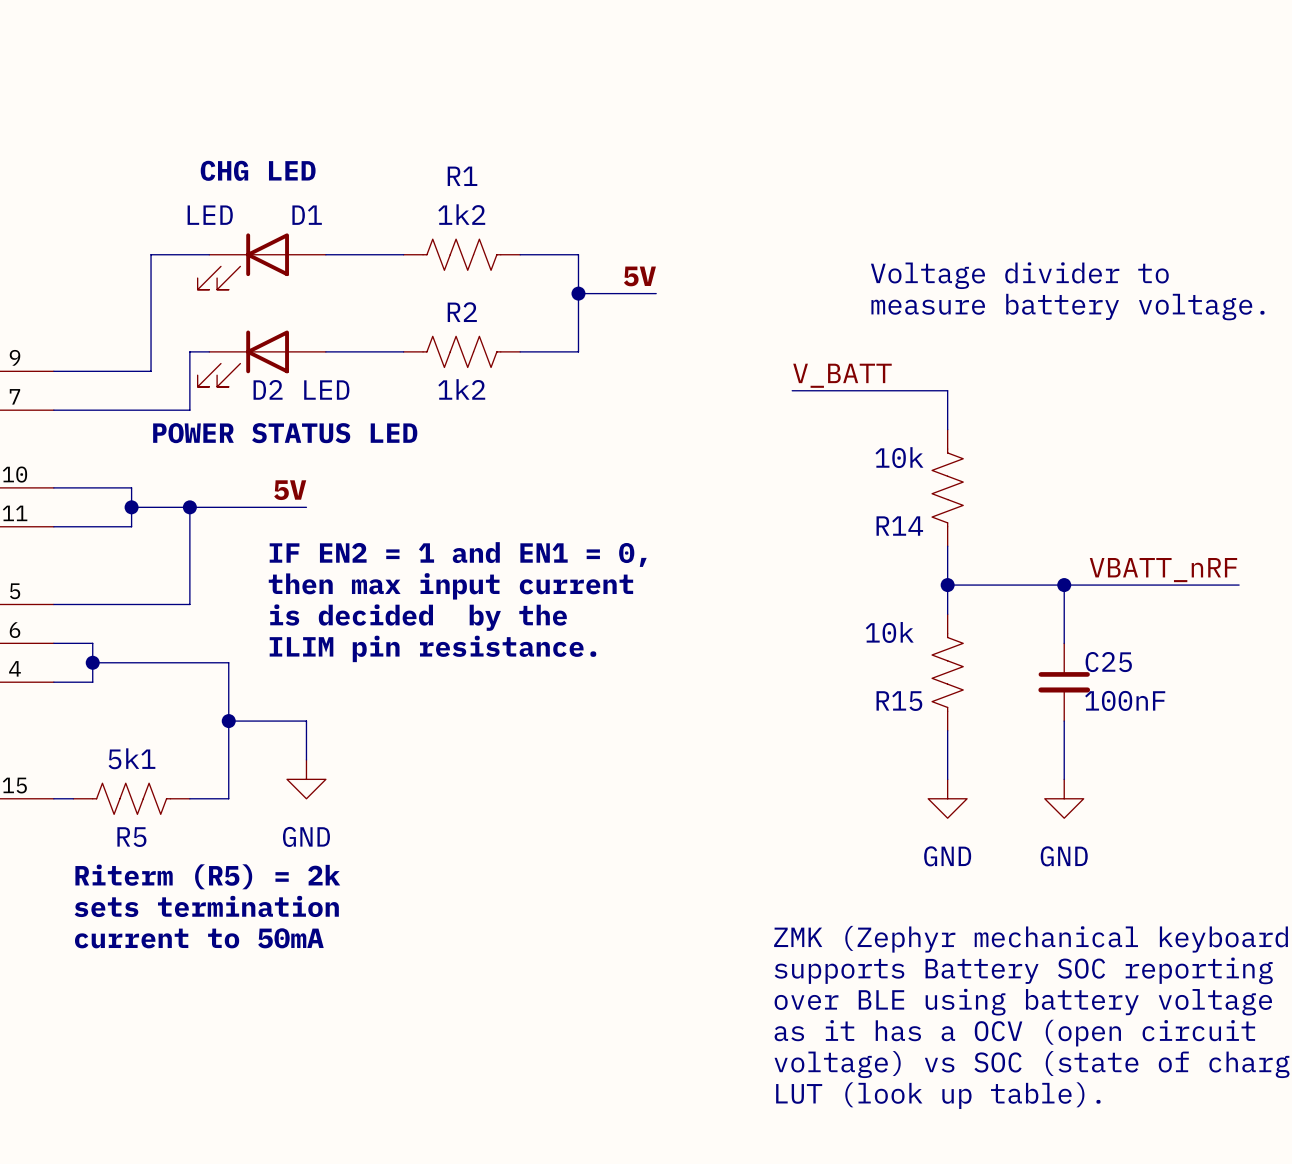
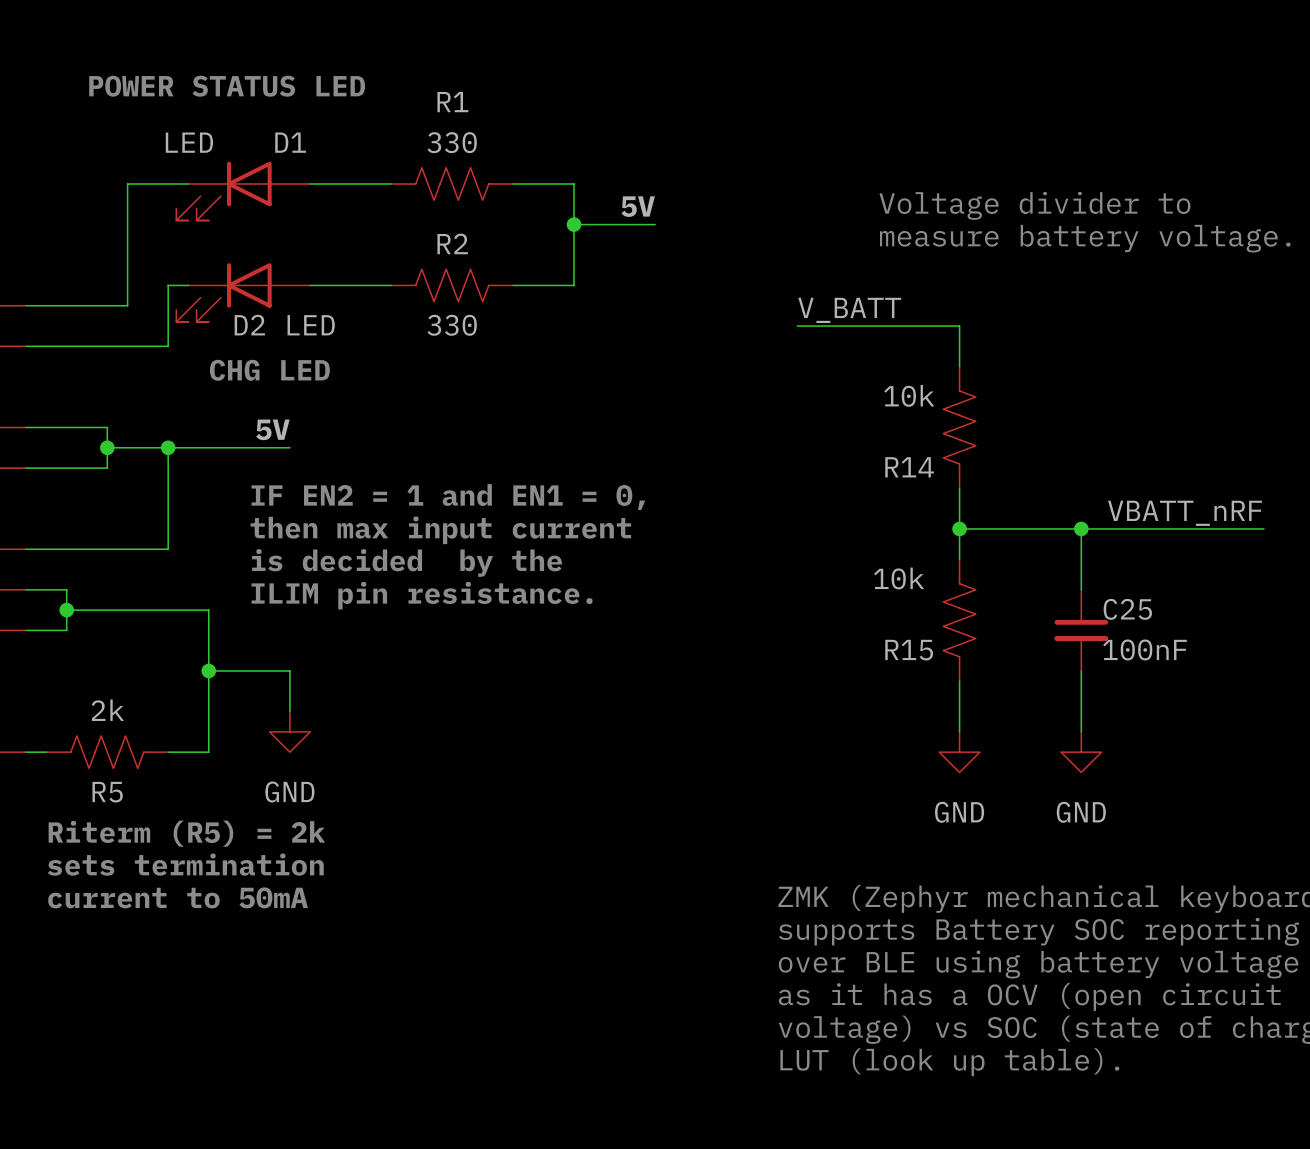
text position: CHG LED (258, 170) -> CHG LED (269, 370)
R1 value: 1k2 (461, 214) -> 330 (452, 142)
R2 value: 1k2 (461, 389) -> 330 (452, 325)
text position: POWER STATUS LED (285, 433) -> POWER STATUS LED (227, 86)
R5 value: 5k1 (131, 758) -> 2k (107, 710)

